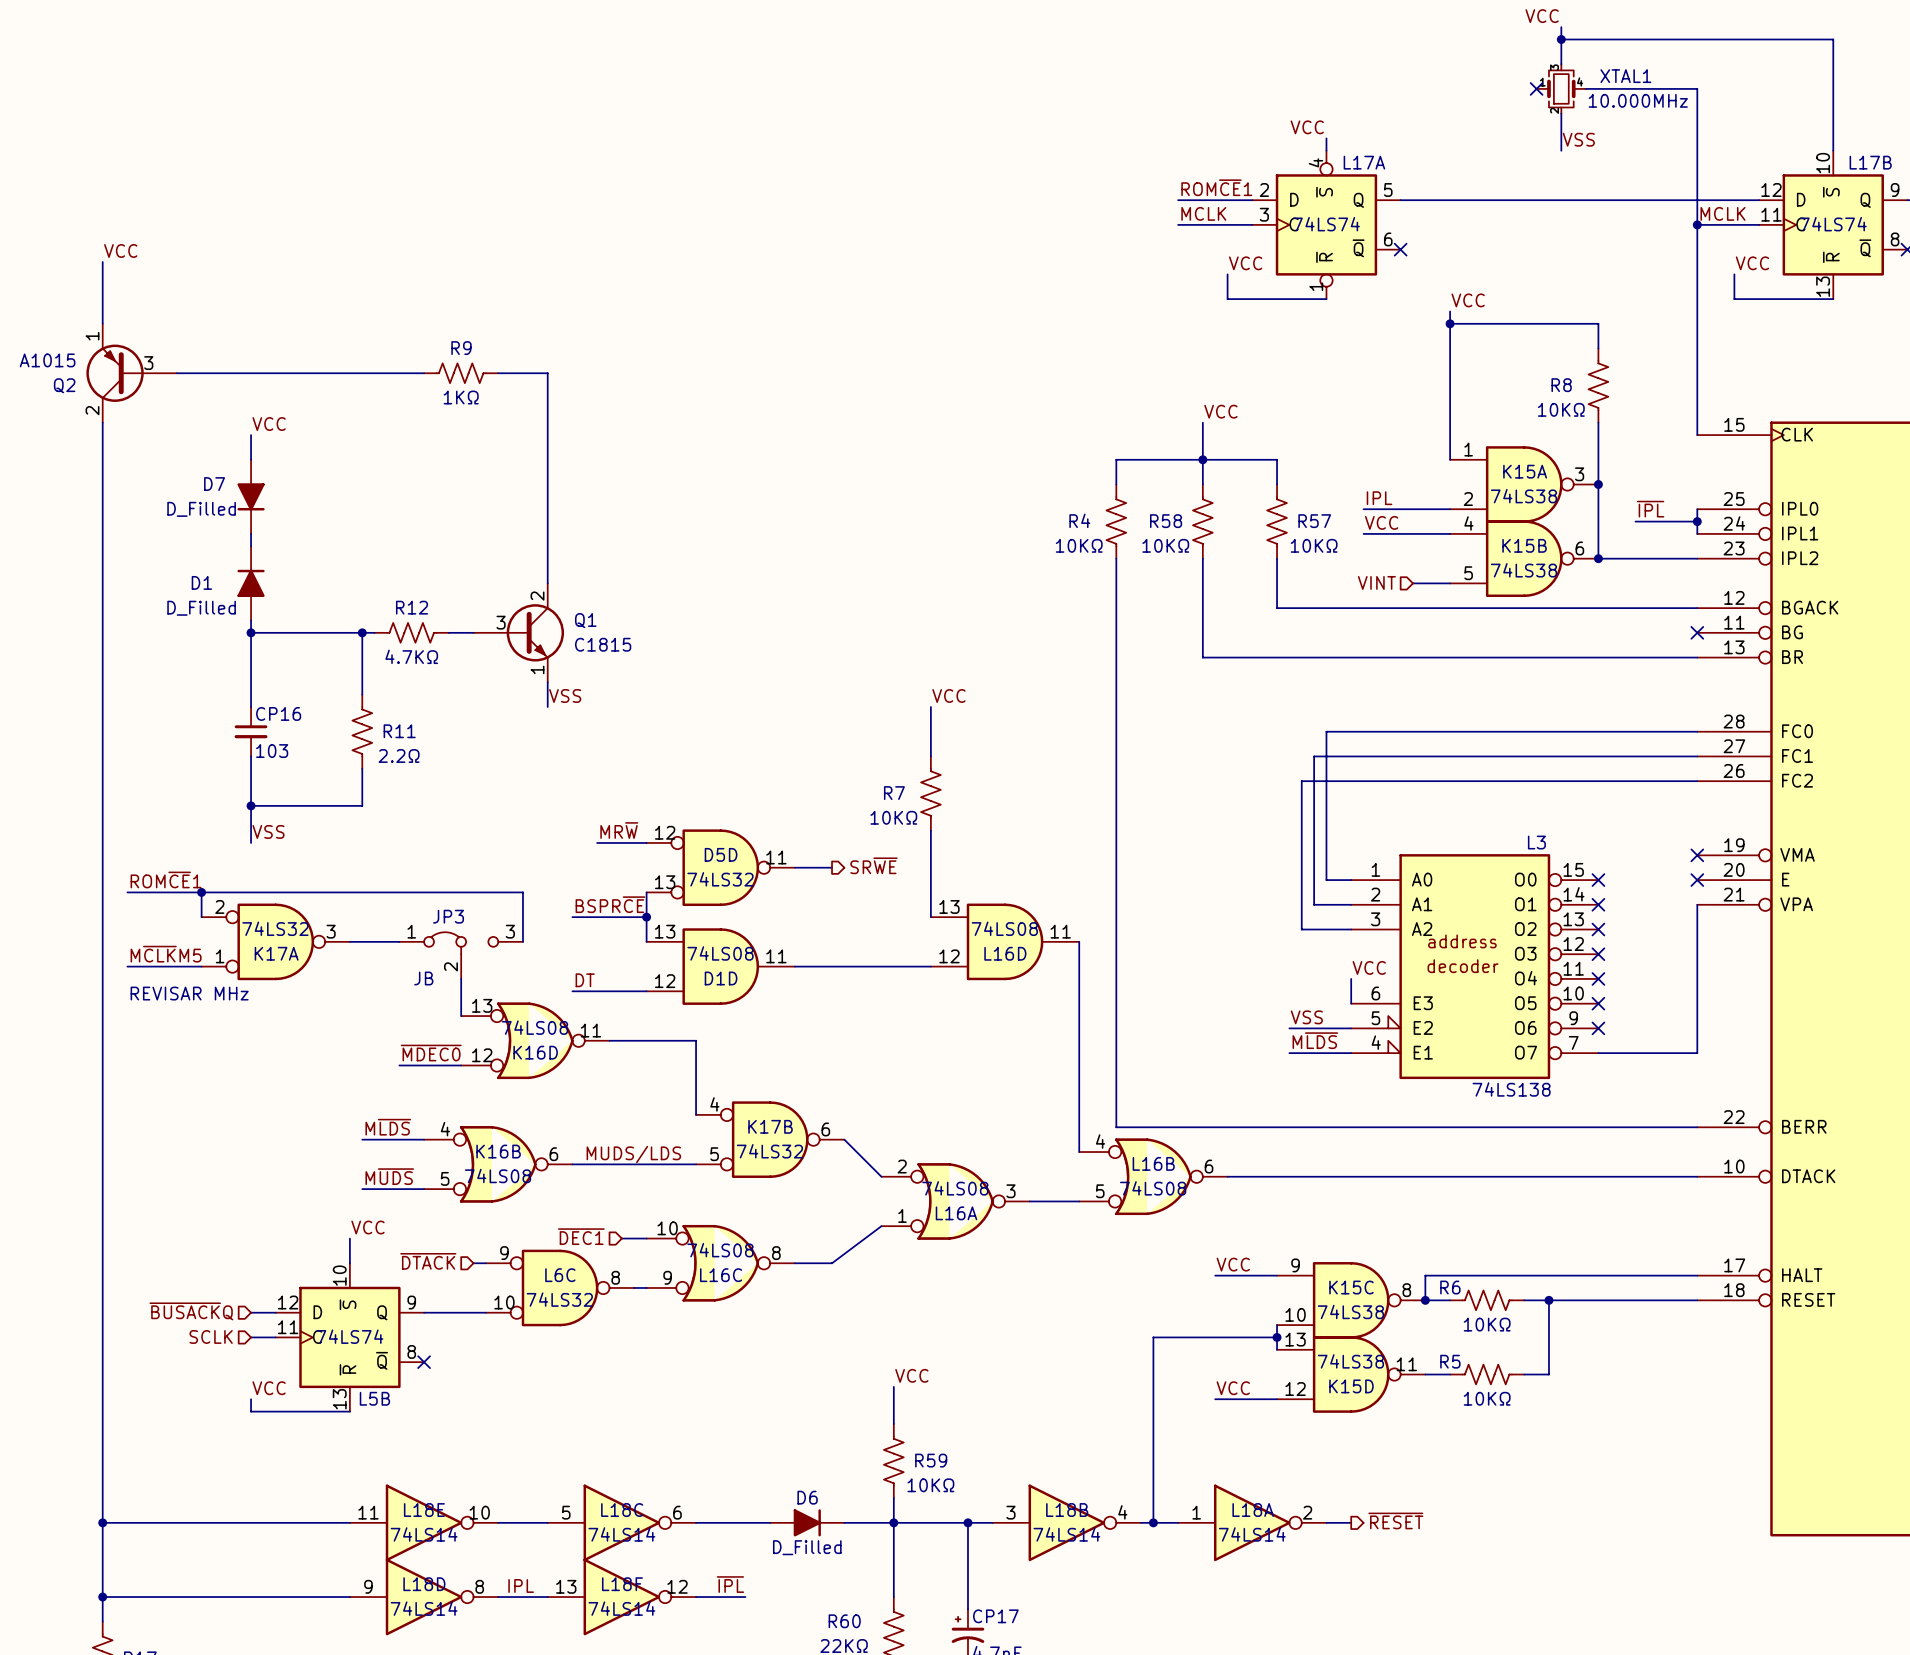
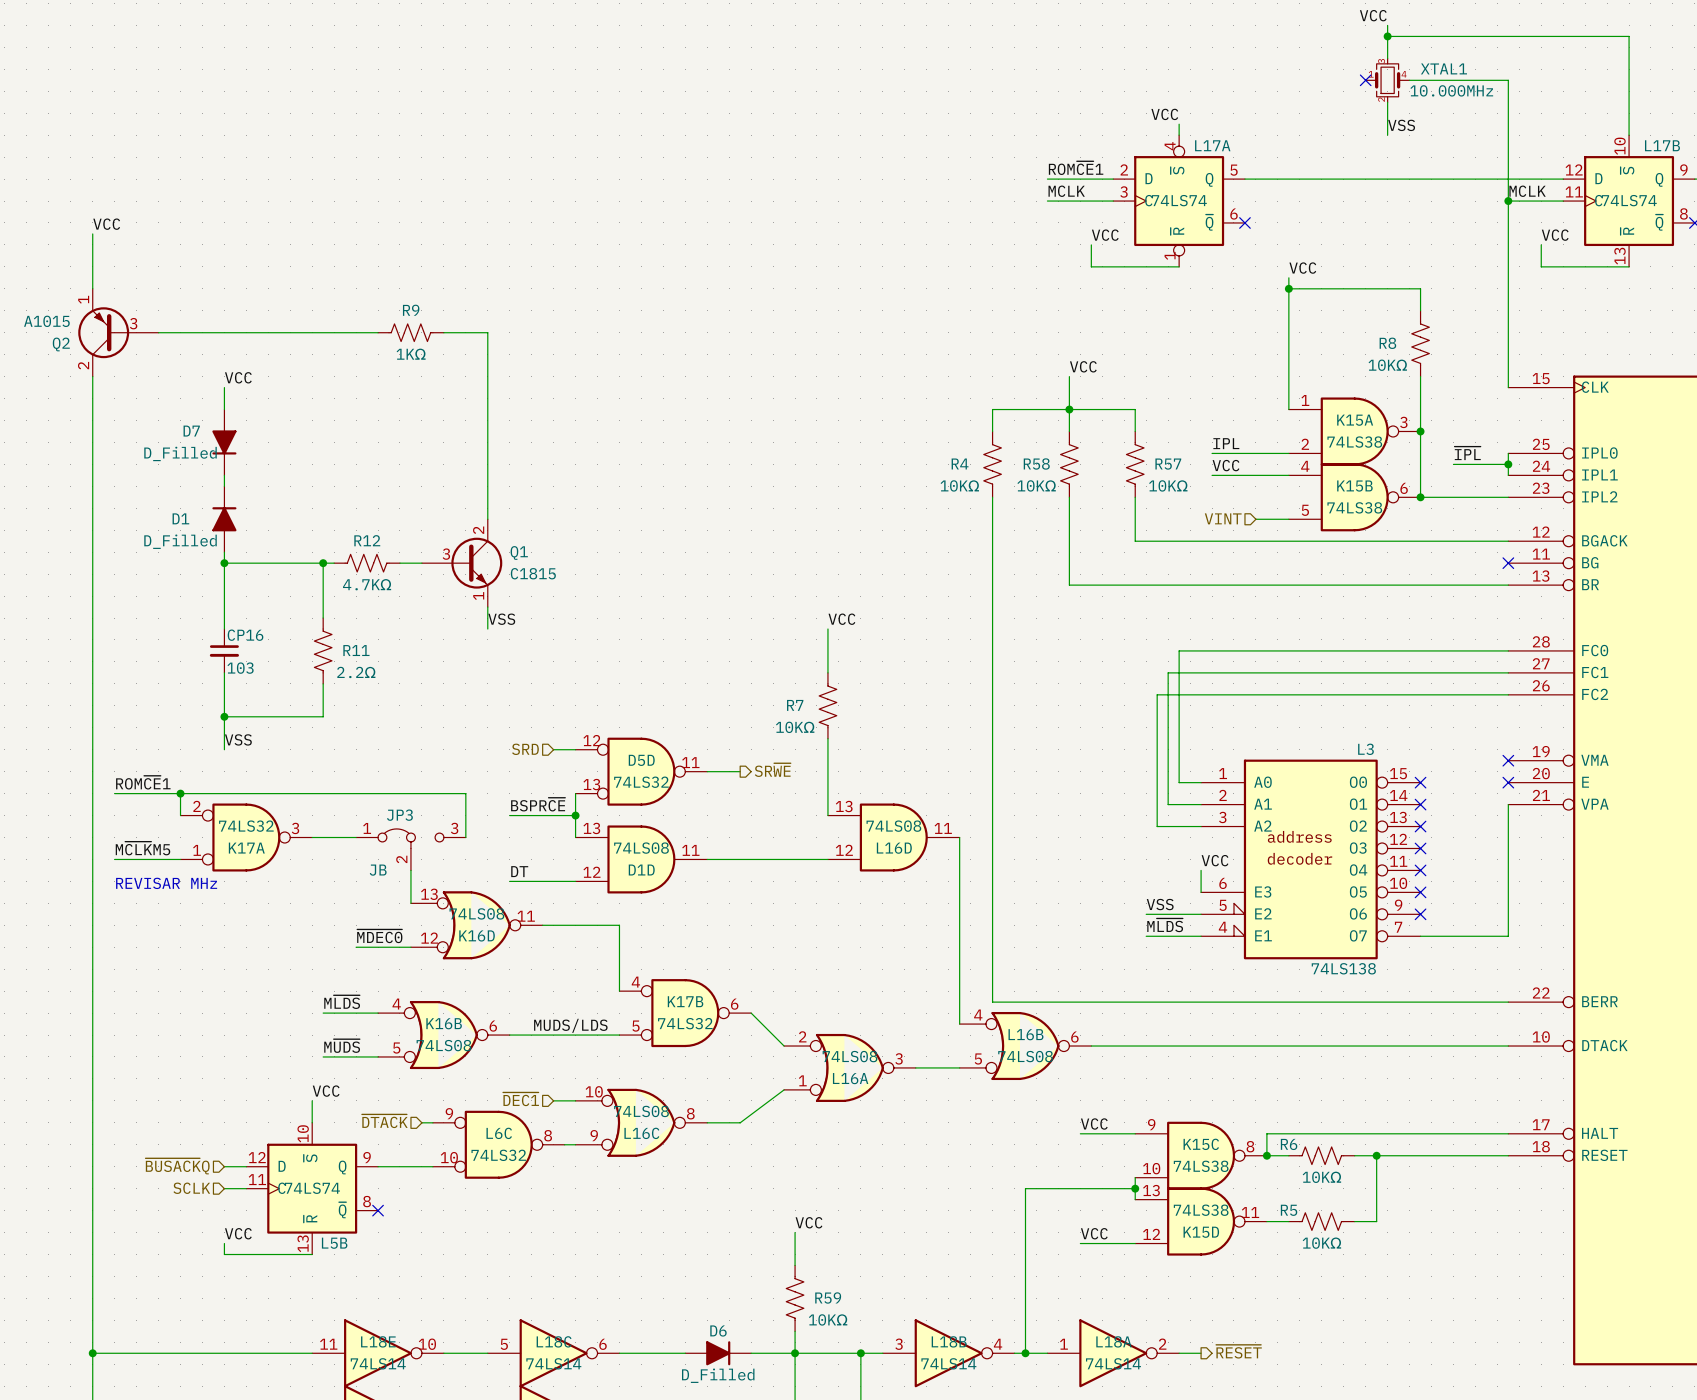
label: MR~{W} (619, 830) -> none
hierarchical label: none -> SRD (525, 749)
wire: (597, 842) (621, 842) -> none

